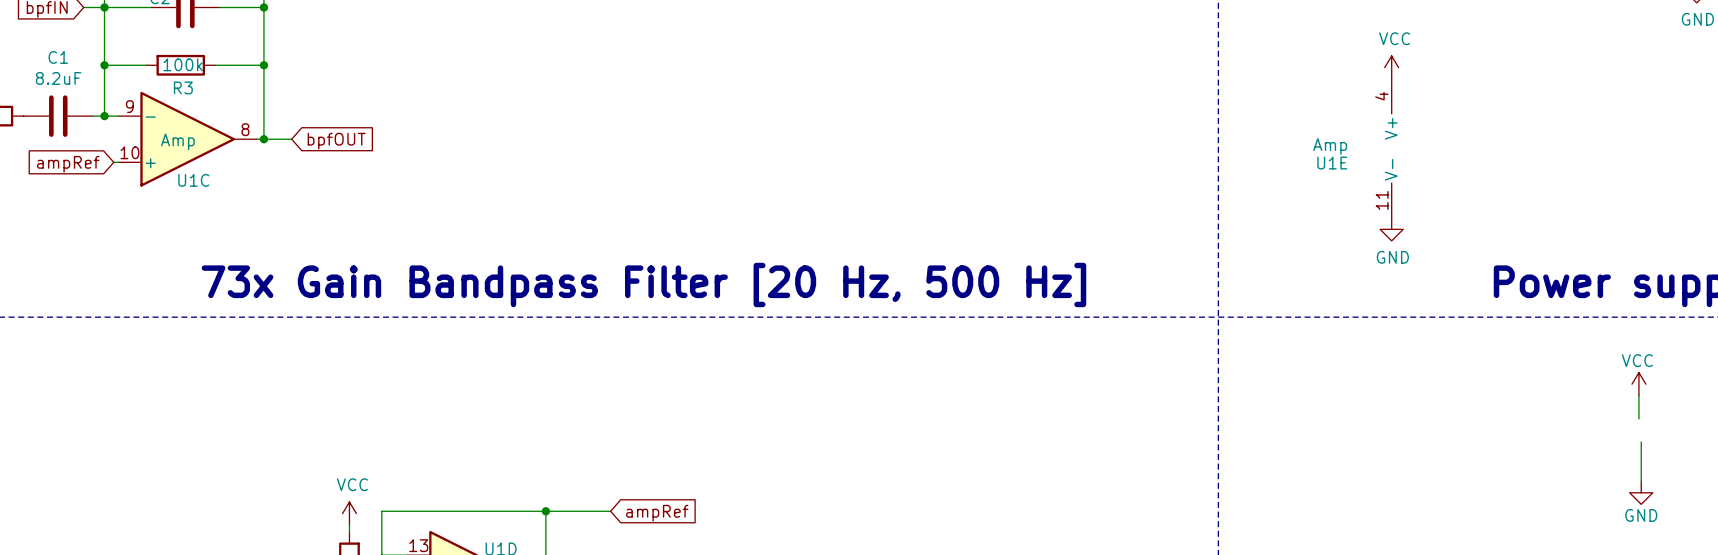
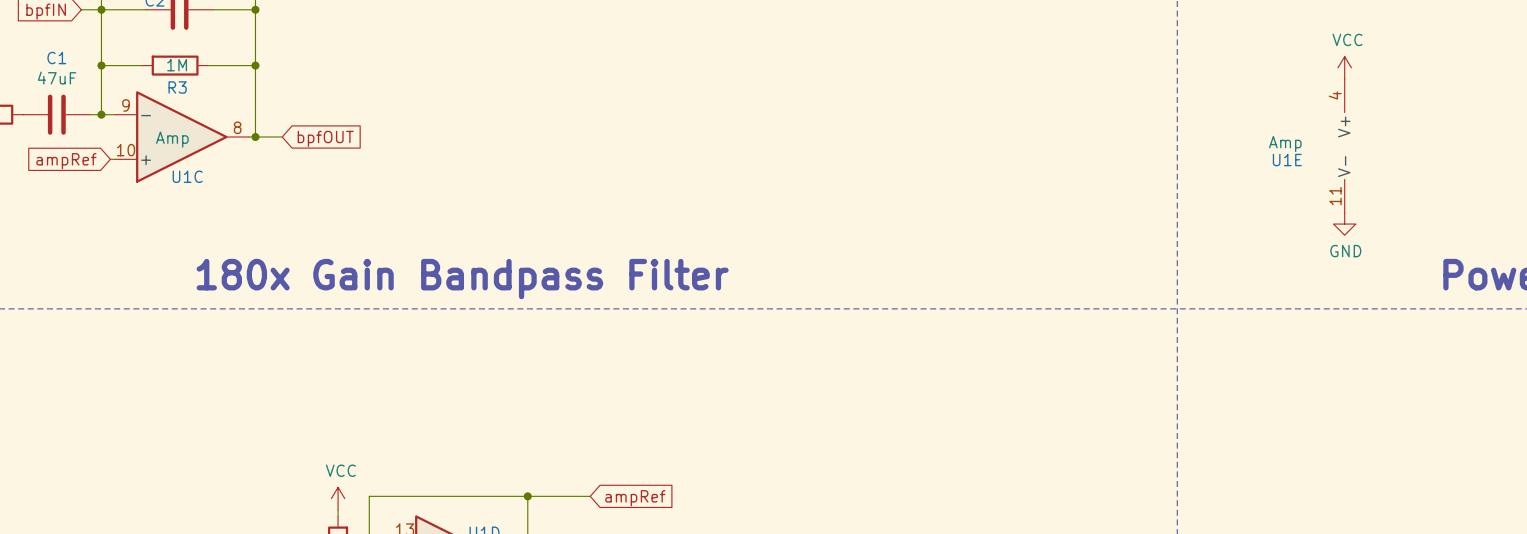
R3 value: 100k (183, 64) -> 1M (177, 65)
C1 value: 8.2uF (58, 78) -> 47uF (57, 78)
text: 73x Gain Bandpass Filter [20 Hz, 500 Hz] (643, 284) -> 180x Gain Bandpass Filter (462, 279)

